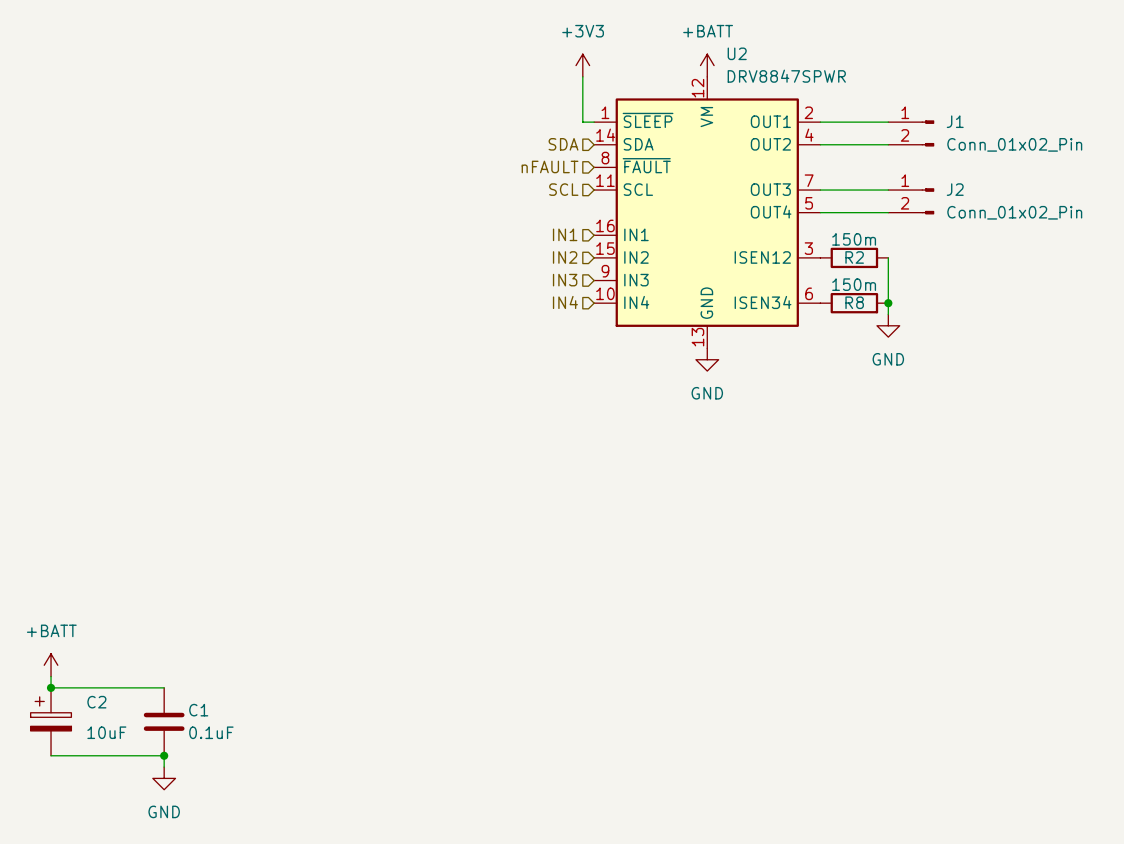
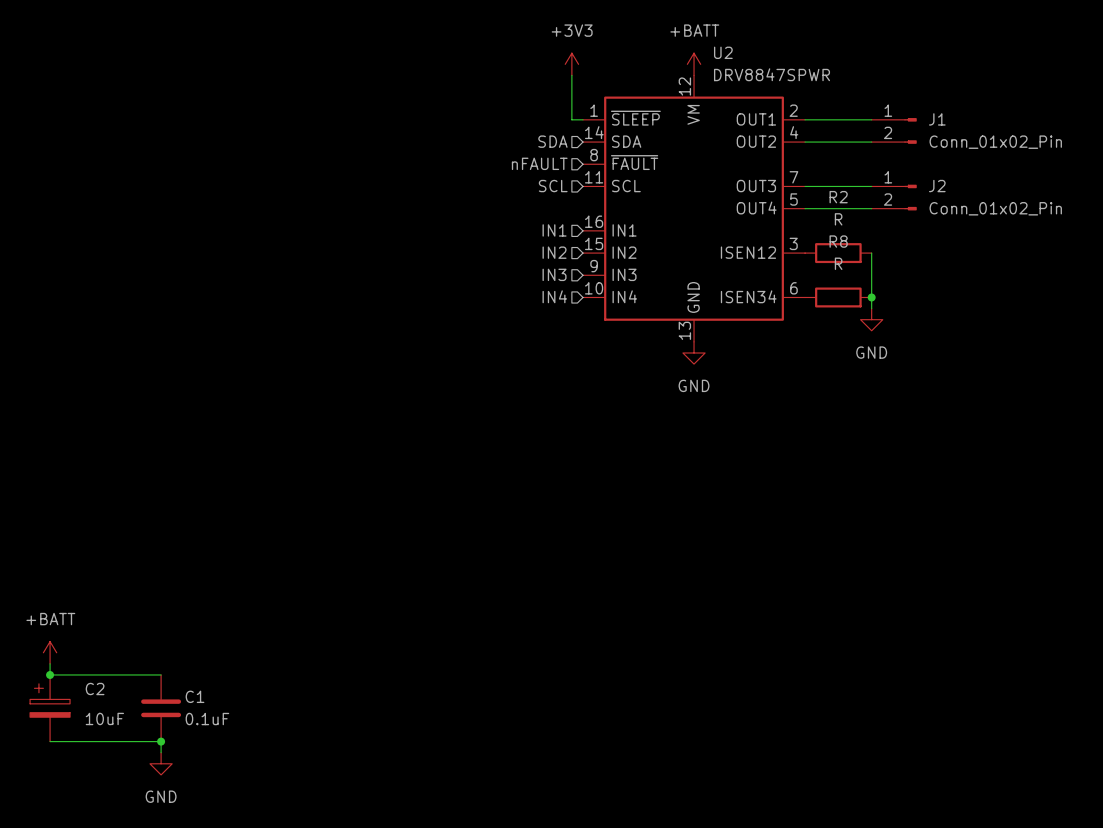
R2 value: 150m (854, 239) -> R (838, 219)
R2 name position: R2 (854, 257) -> R2 (838, 197)
R8 value: 150m (854, 284) -> R (838, 263)
R8 name position: R8 (854, 302) -> R8 (838, 241)

